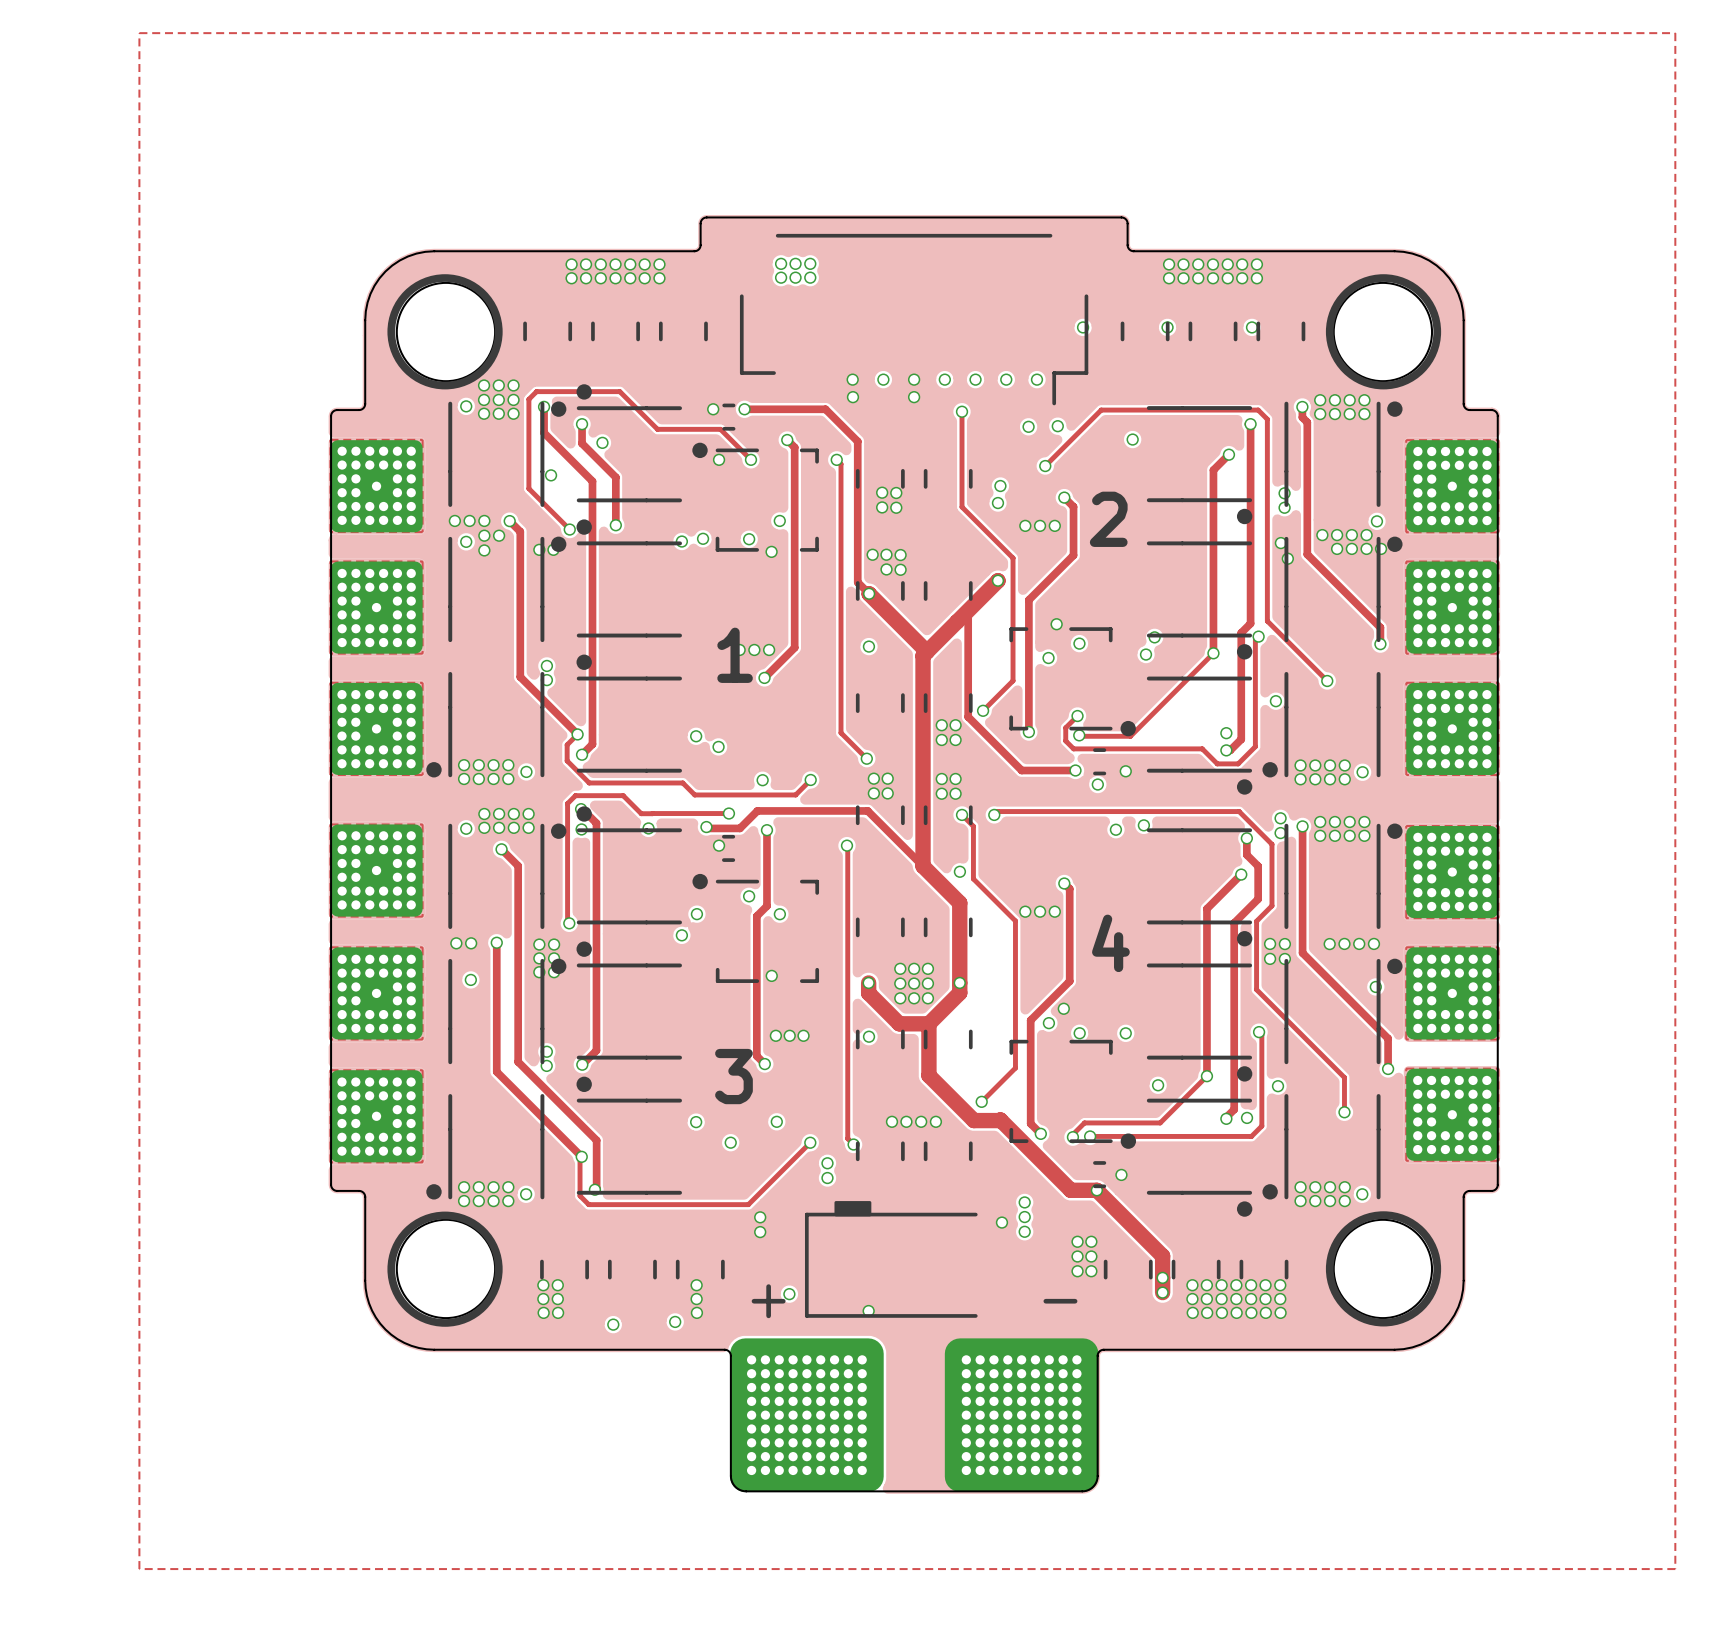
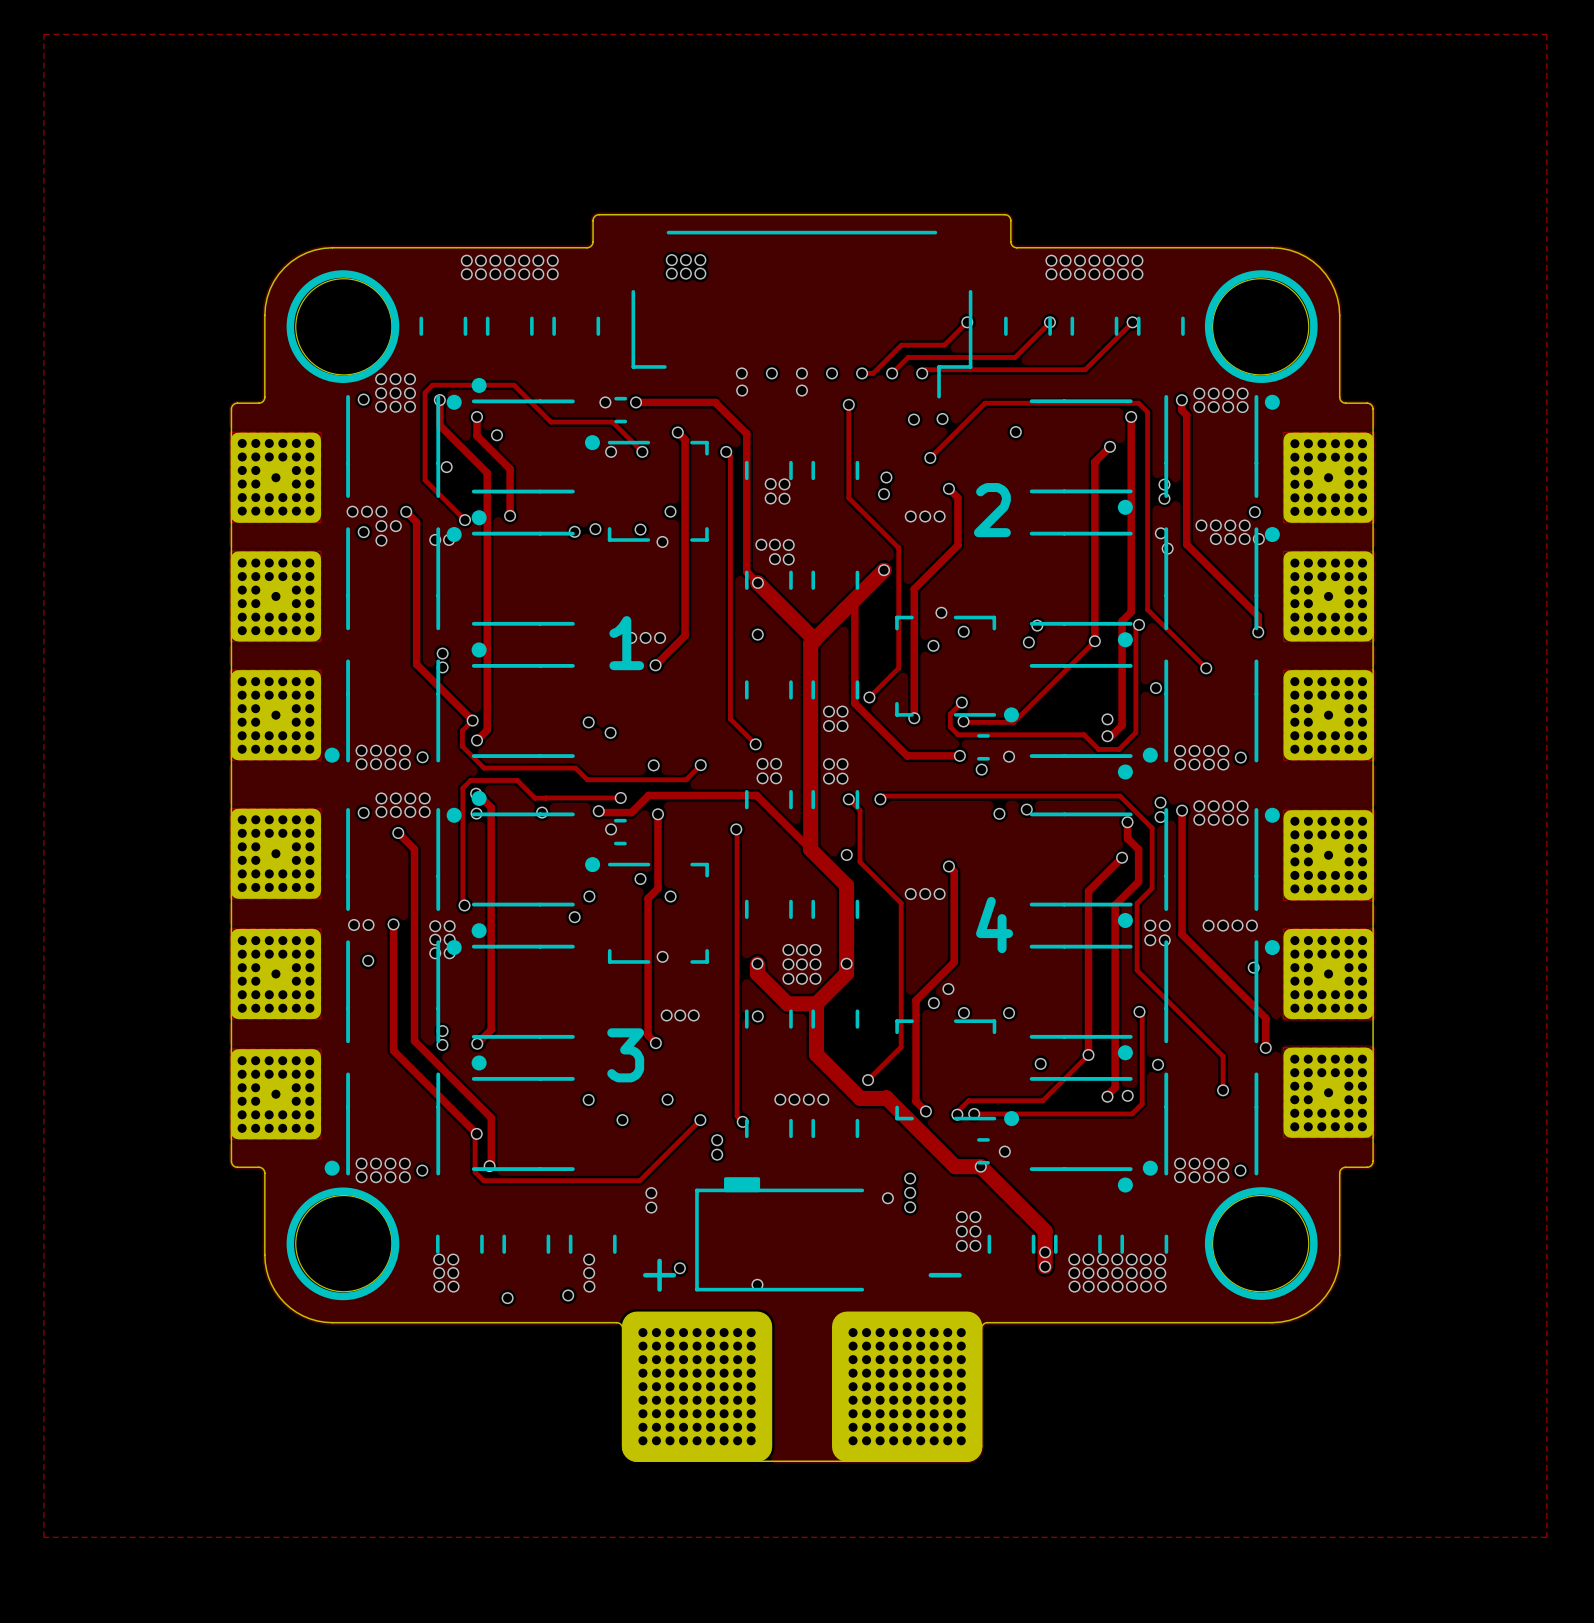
track: none -> (967, 322) (944, 345) (901, 345) (873, 373) (862, 373)
track: none -> (1049, 322) (1015, 357) (908, 357) (892, 373)
track: none -> (1132, 322) (1085, 369) (925, 369) (922, 373)

